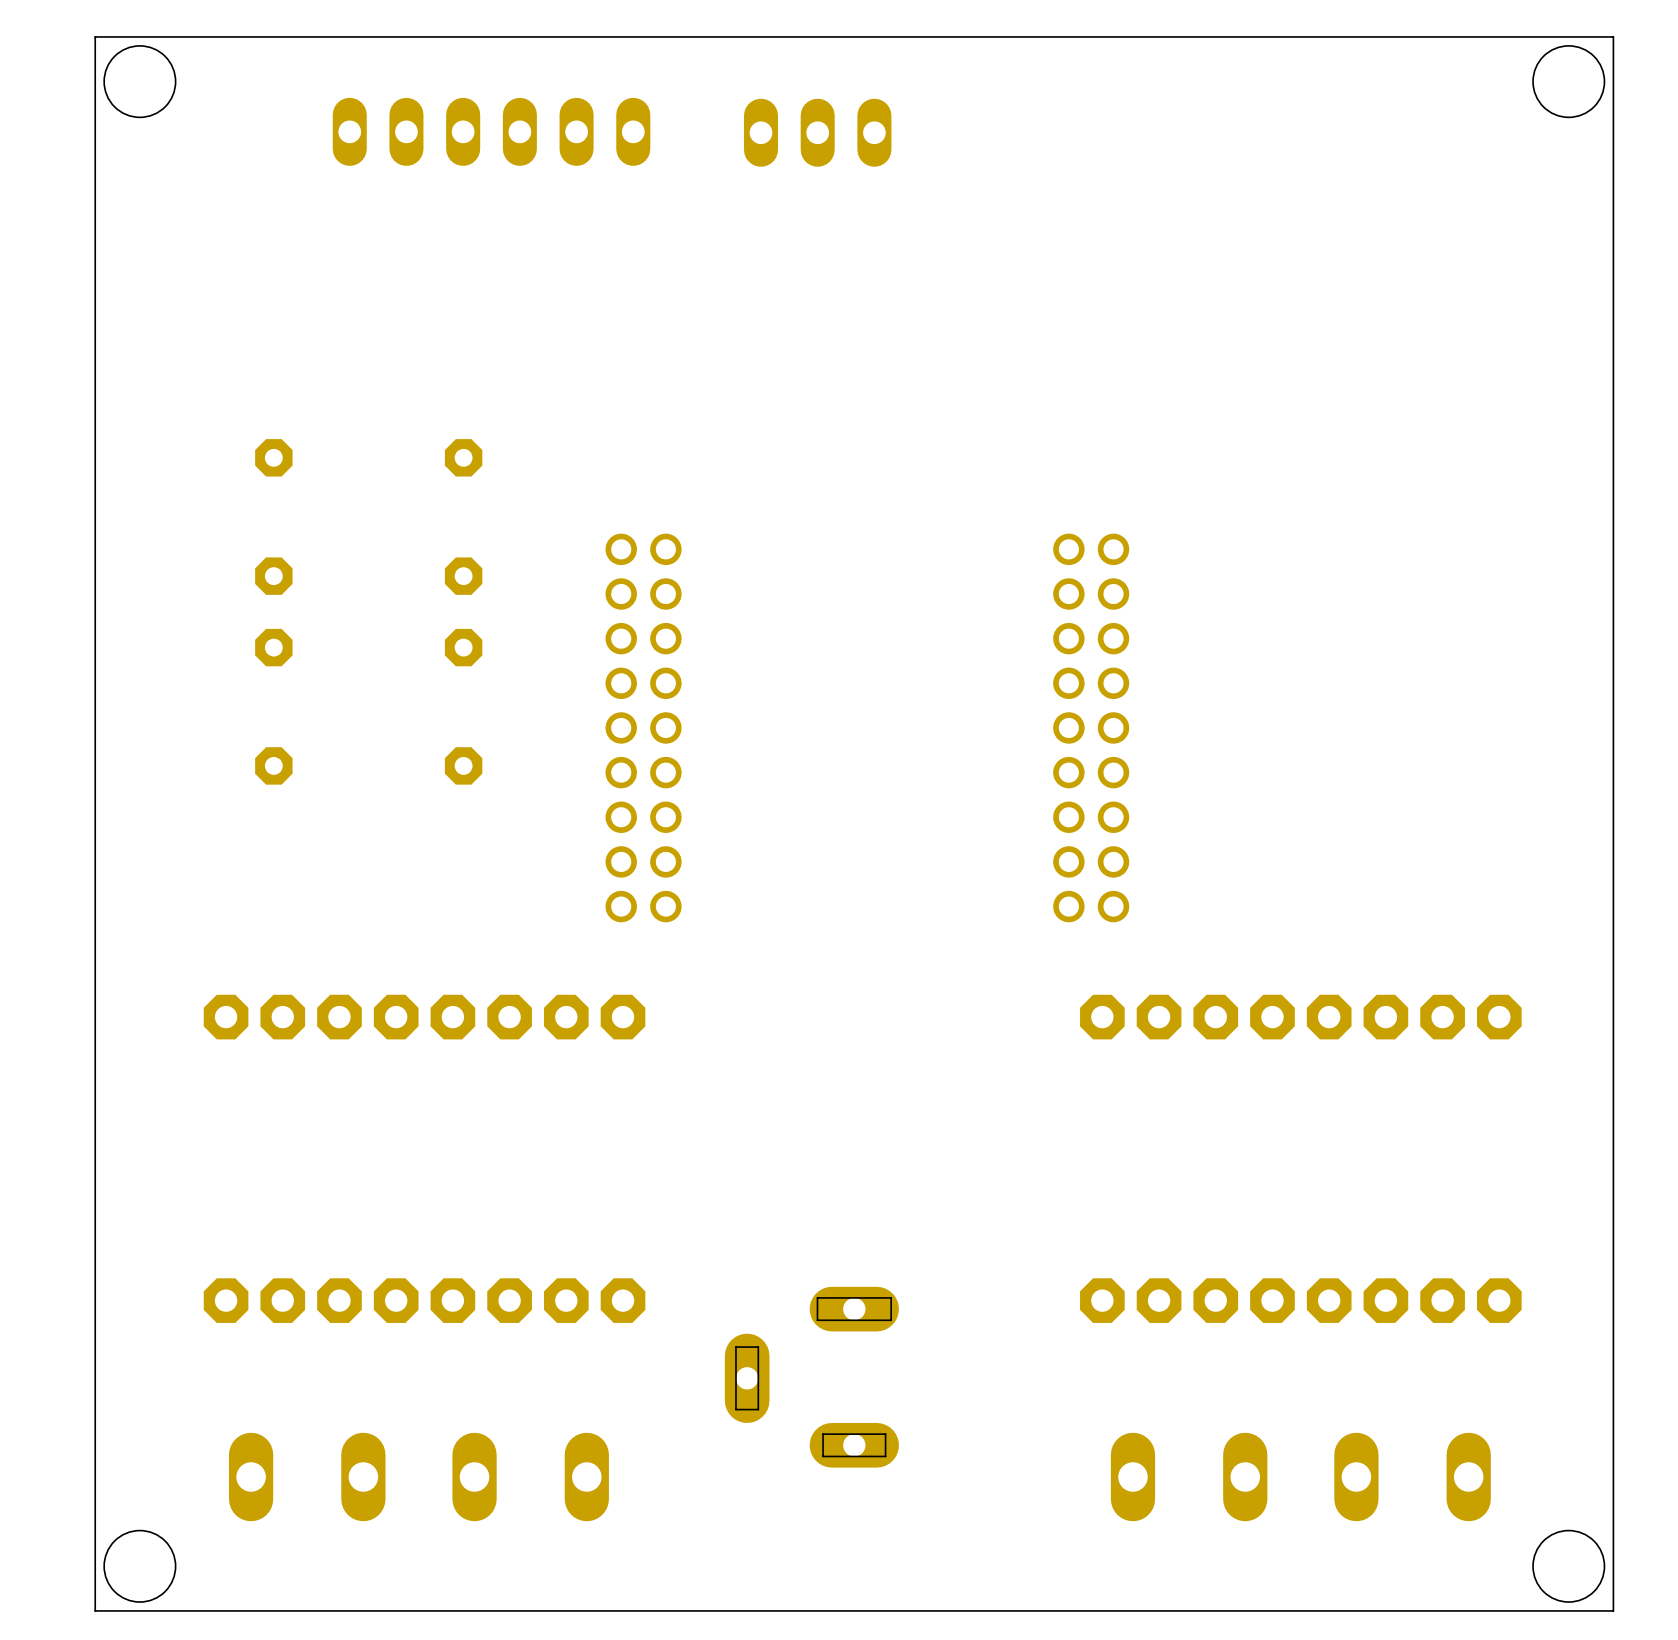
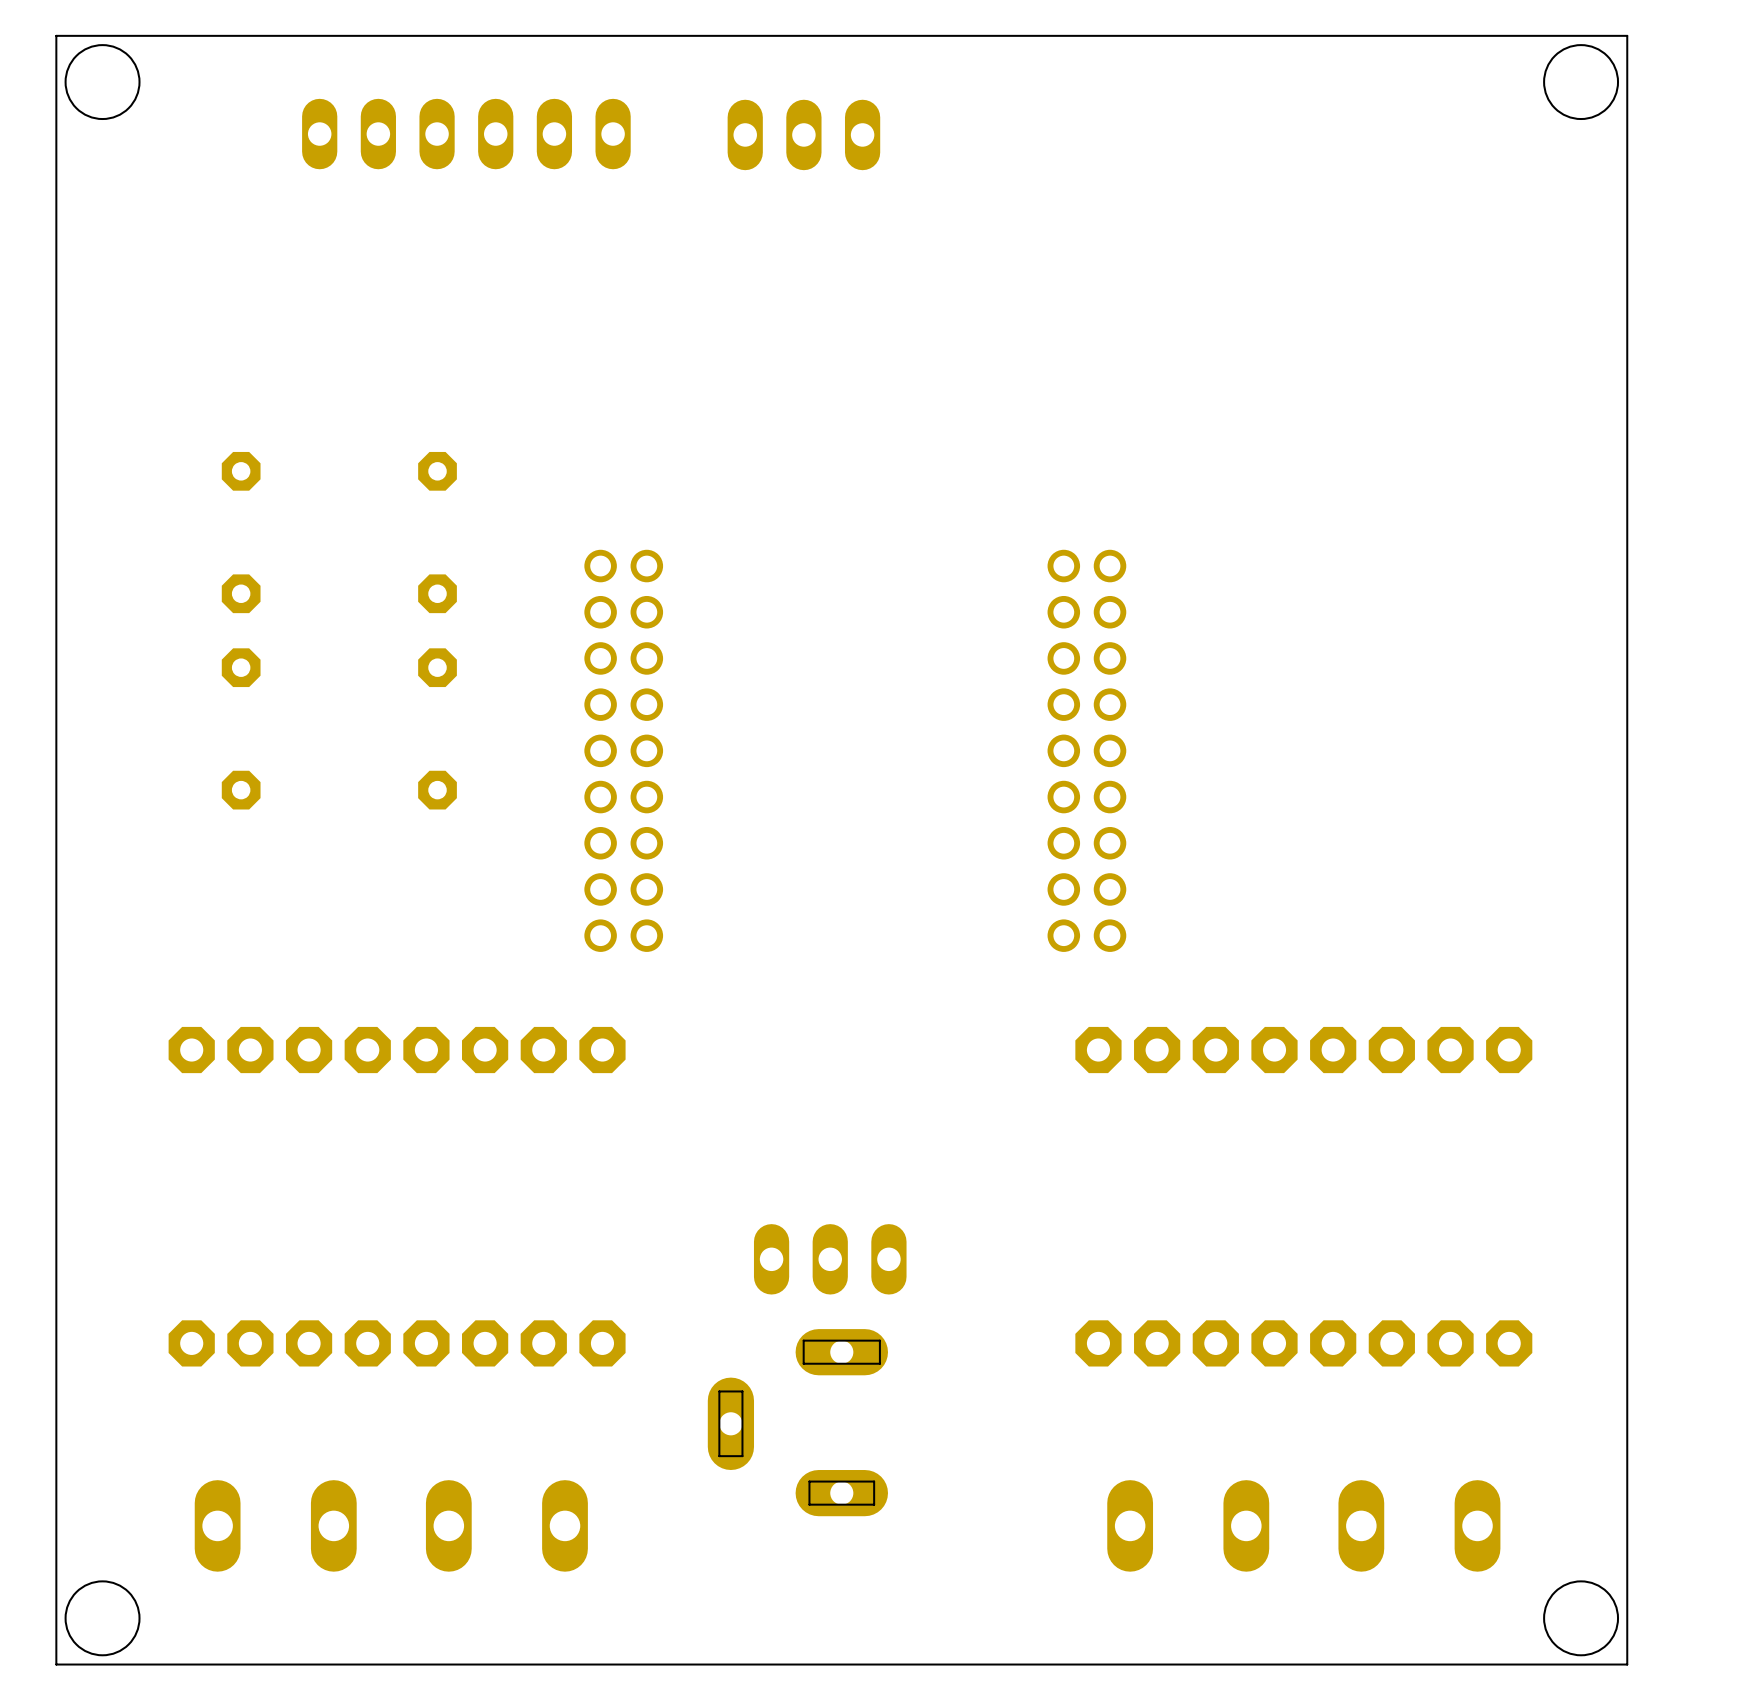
part: none -> (830, 1259)

